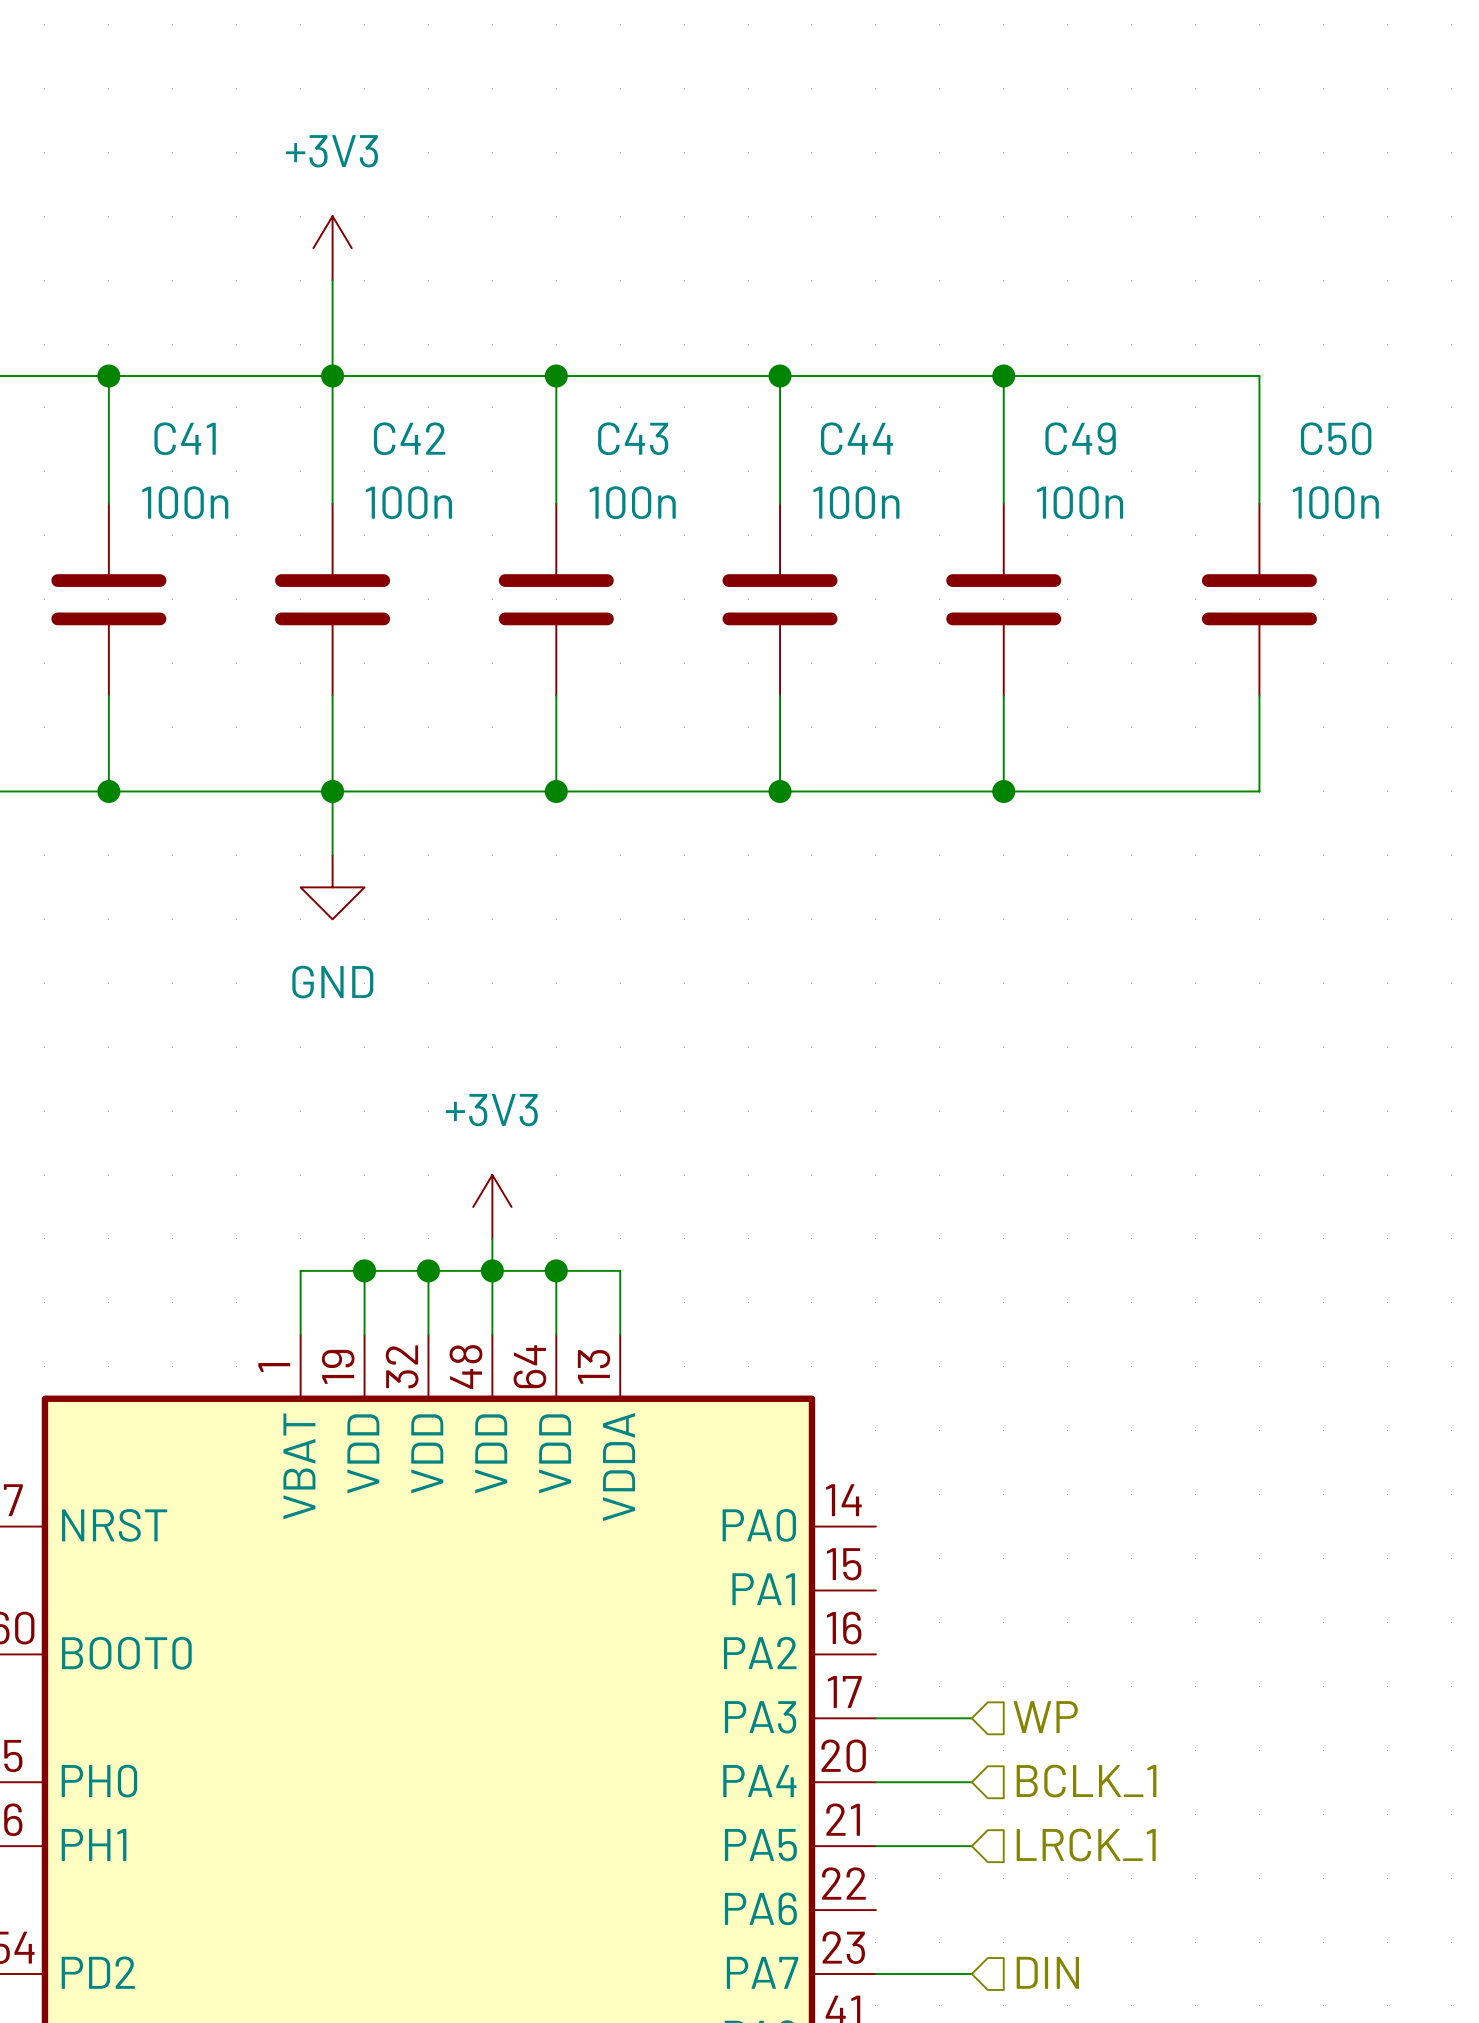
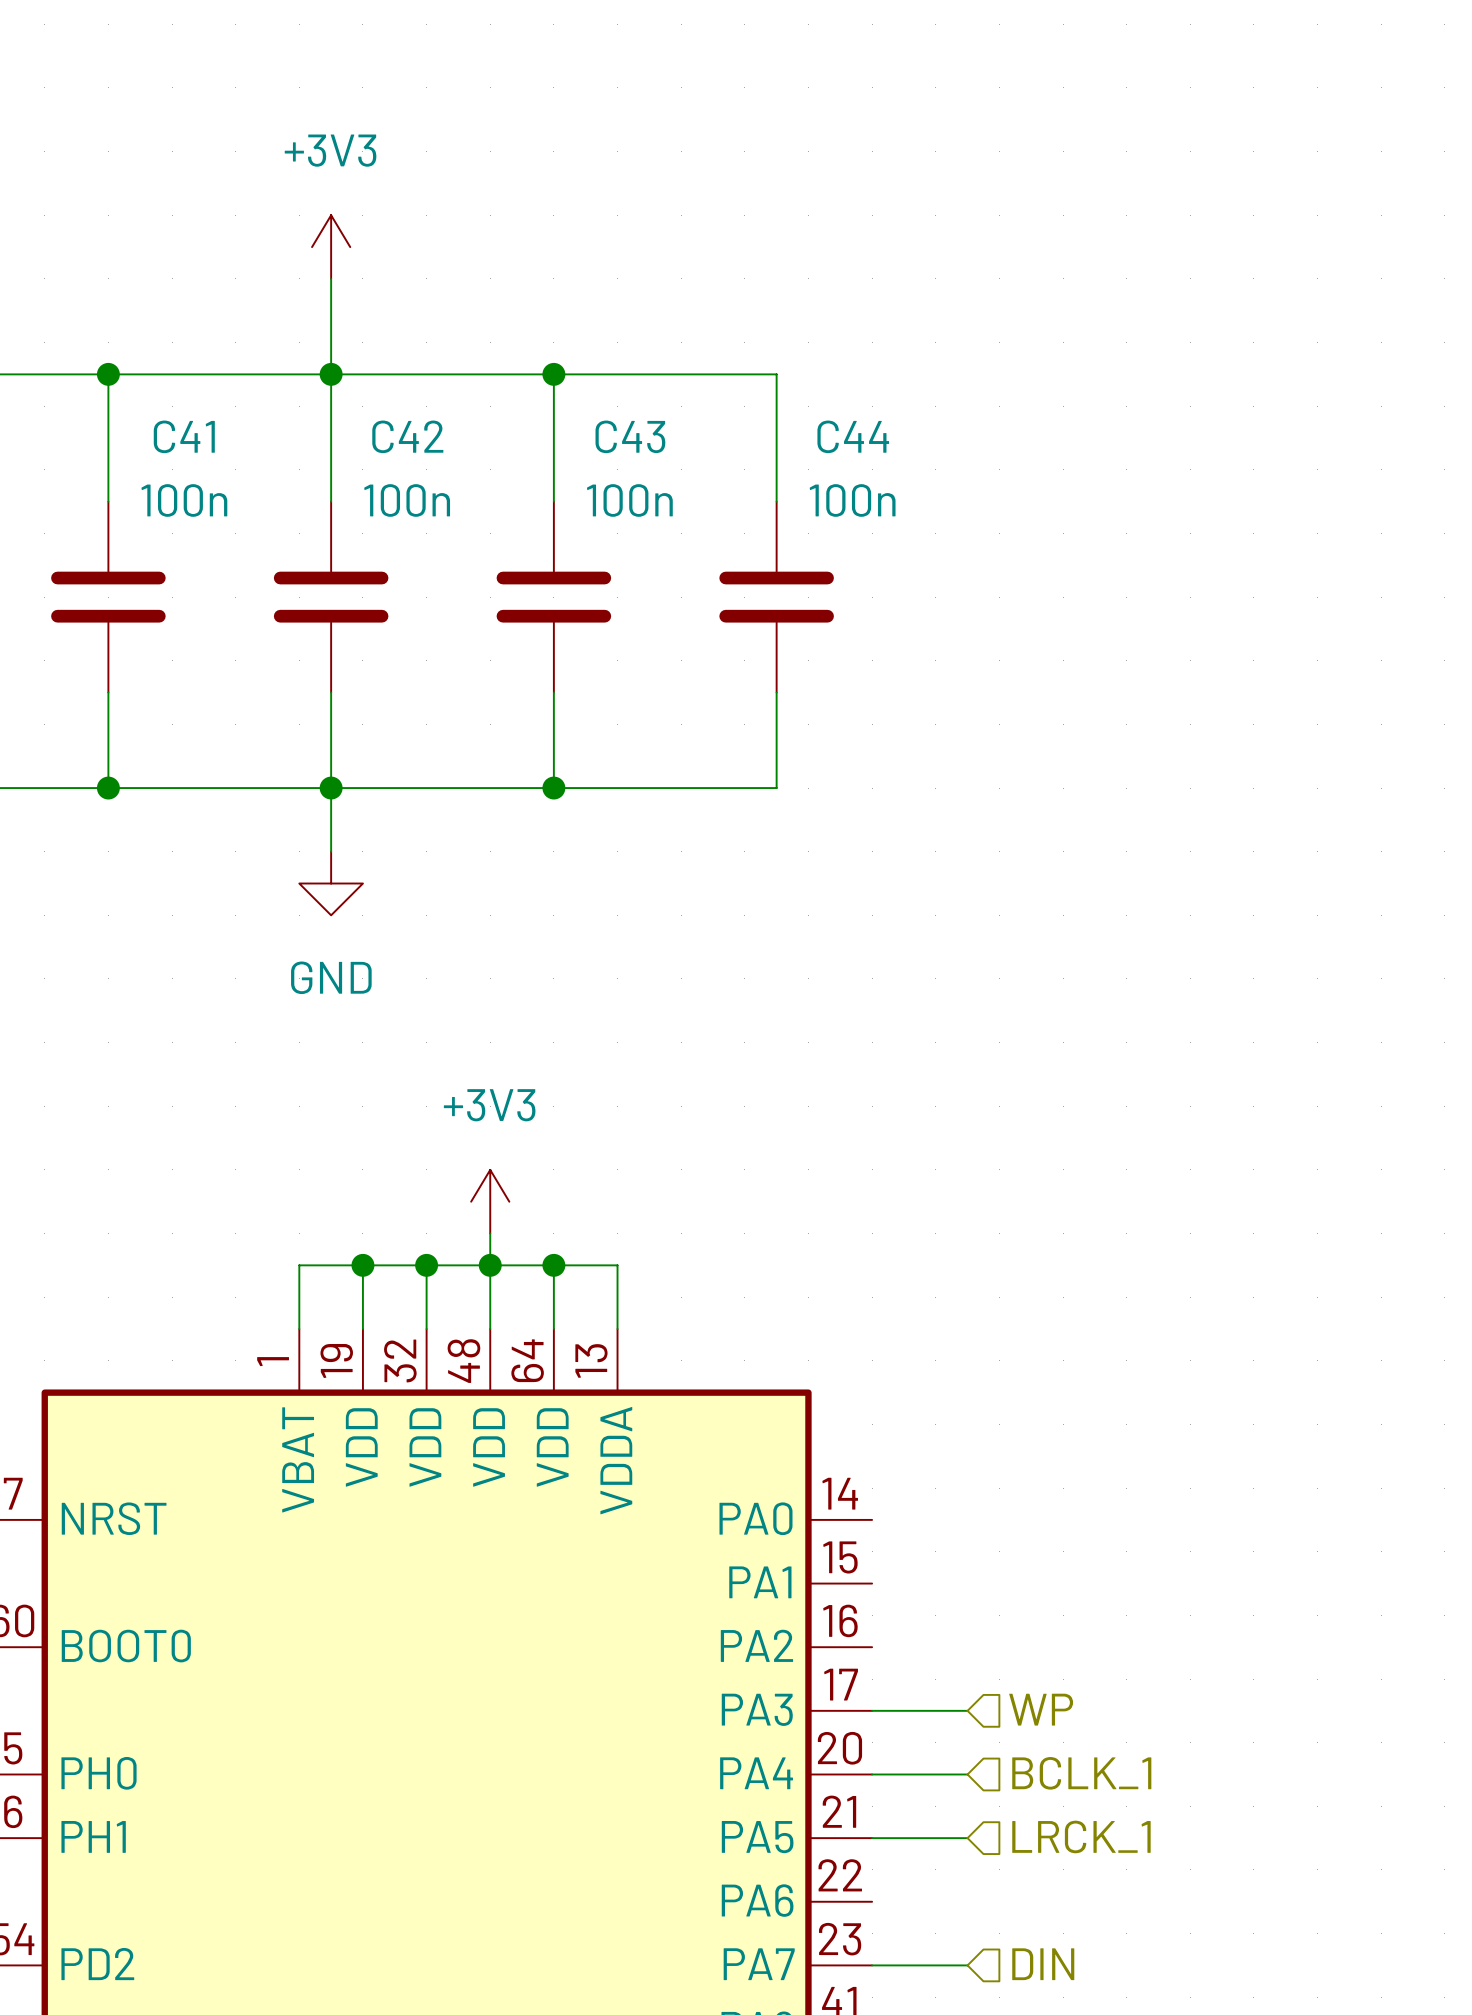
wire: (780, 376) (1259, 376) (1259, 503) -> none
junction: (780, 376) -> none
wire: (1003, 376) (1003, 503) -> none
junction: (1003, 376) -> none
C49: 100n (1003, 599) -> none
C50: 100n (1259, 599) -> none
wire: (1003, 695) (1003, 791) -> none
wire: (1259, 695) (1259, 791) (780, 791) -> none
junction: (780, 791) -> none
junction: (1003, 791) -> none

